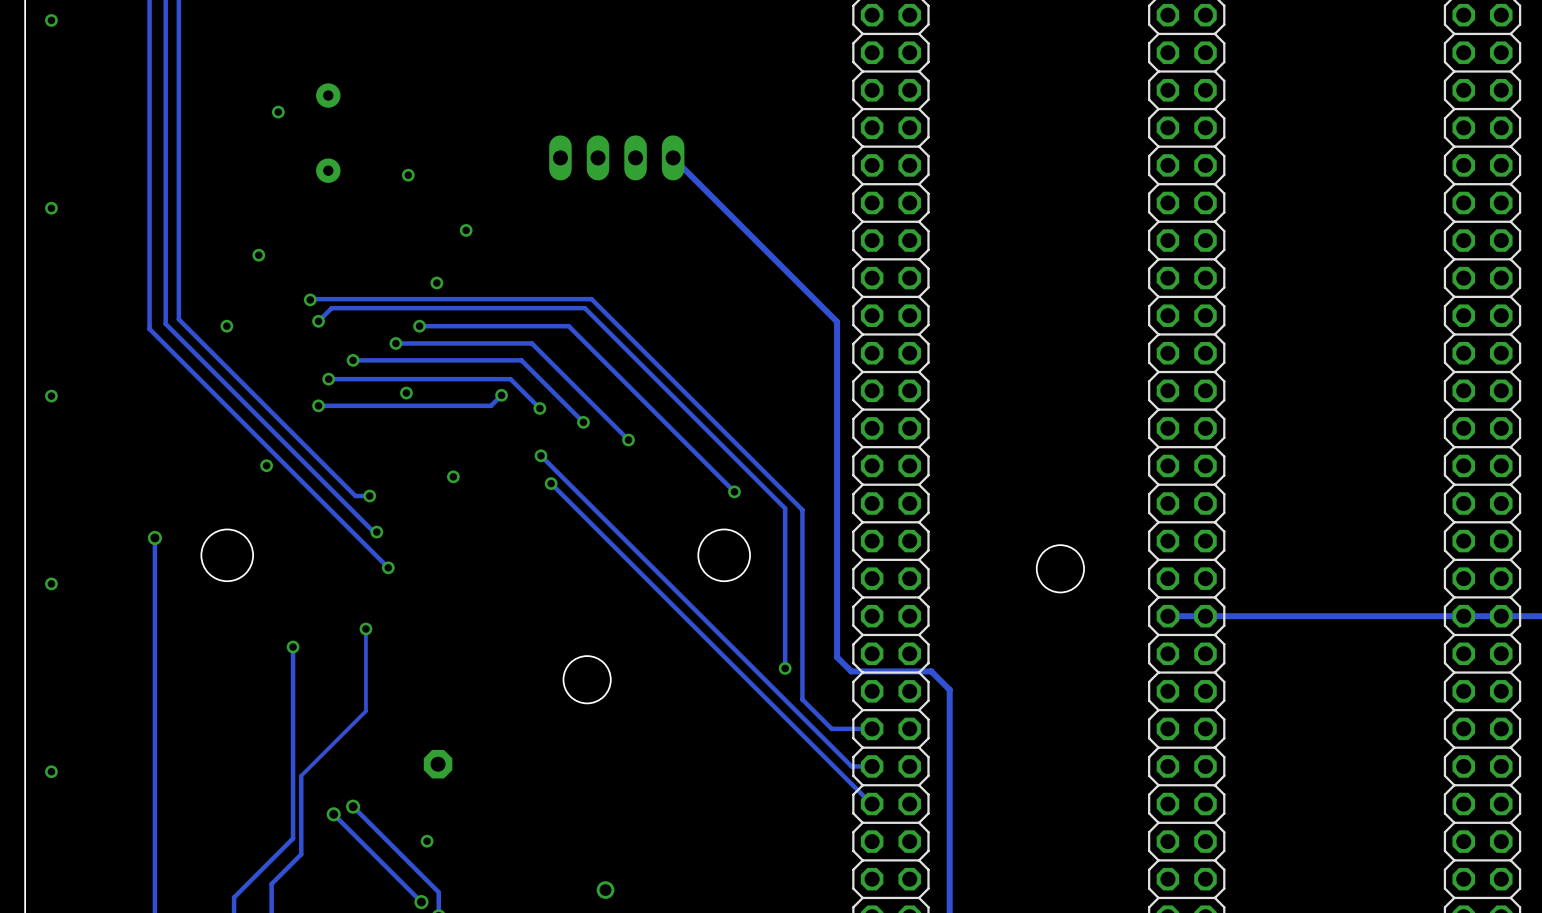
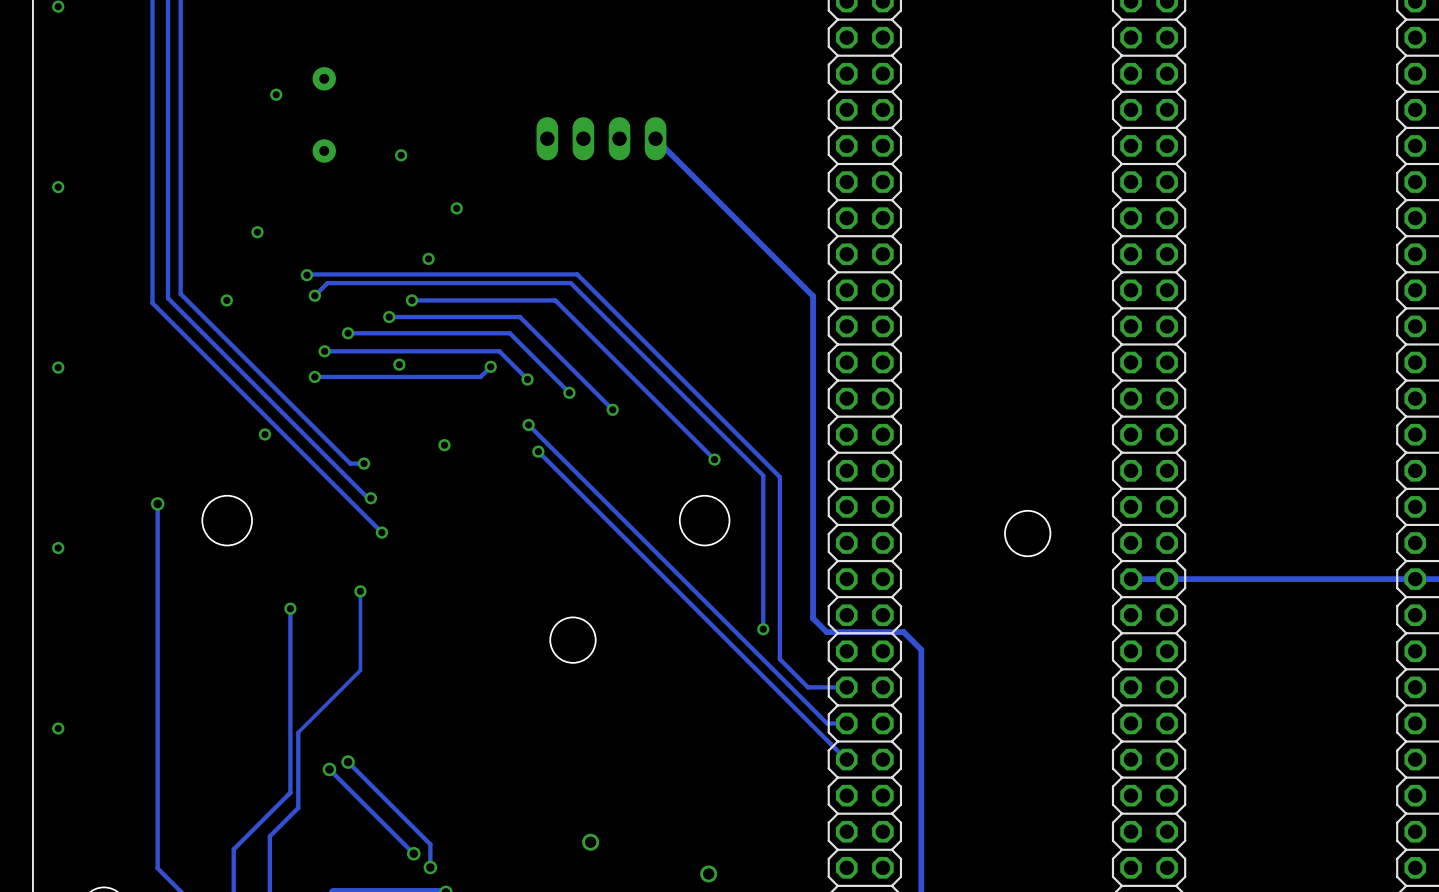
part: (438, 764) -> none
via: (427, 841) -> none

